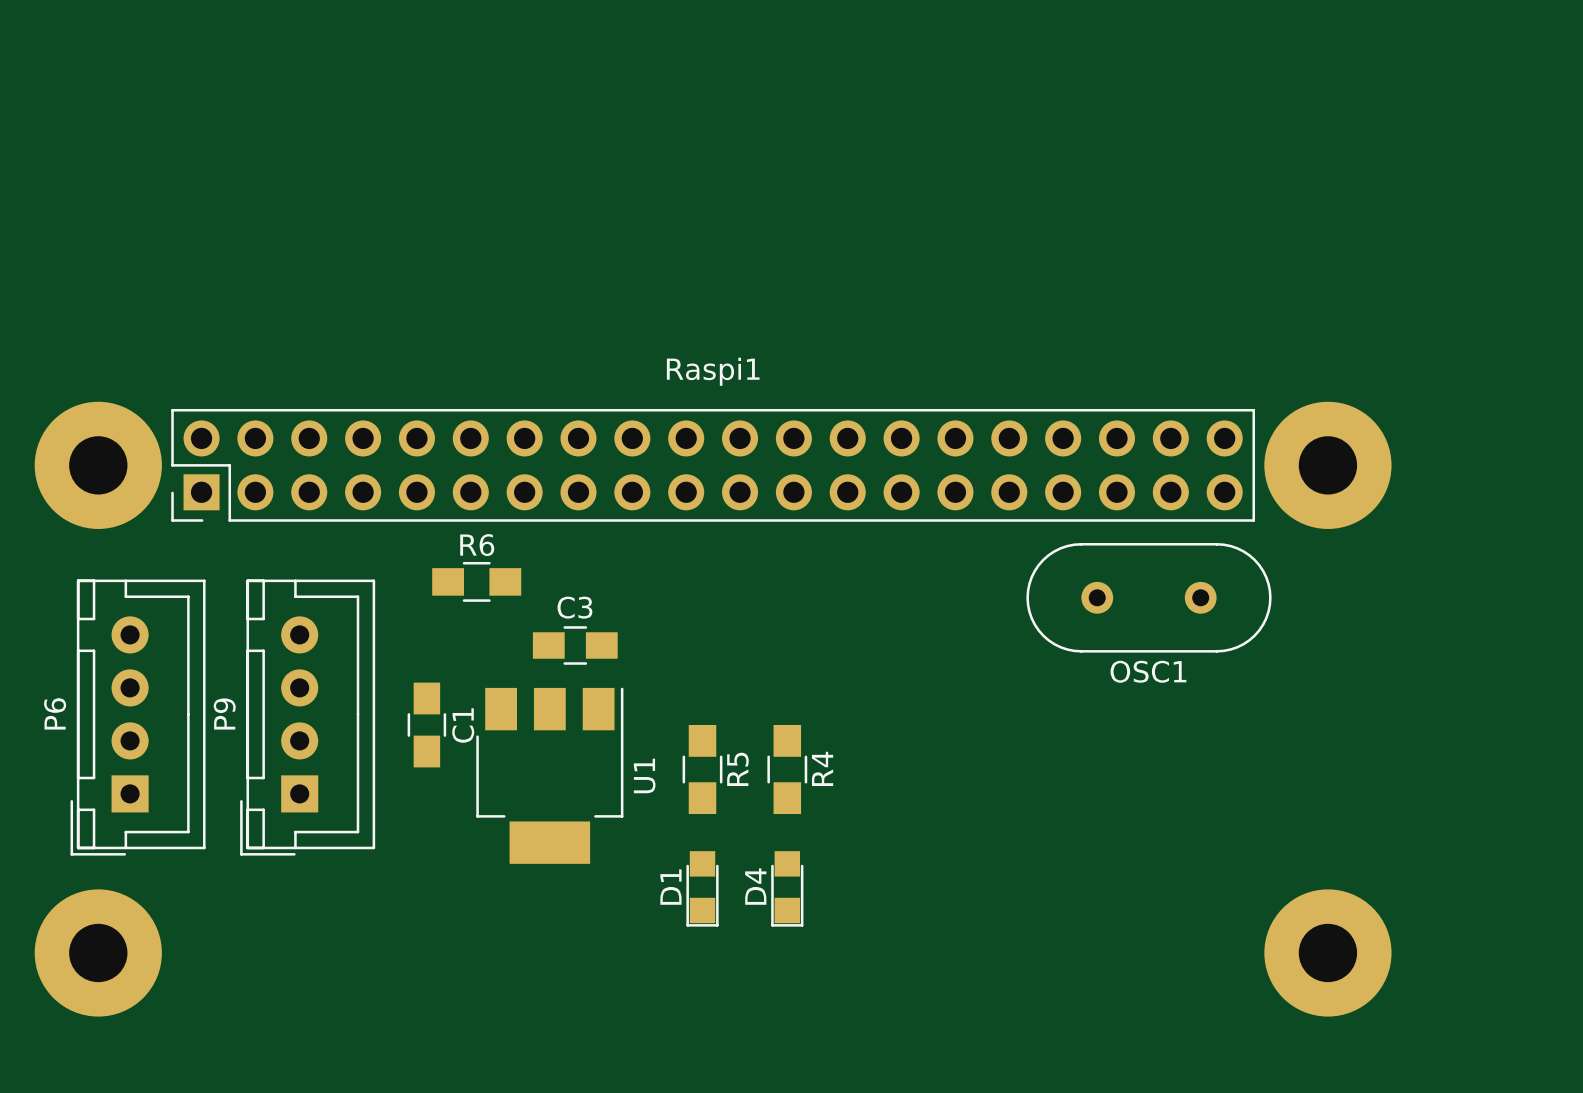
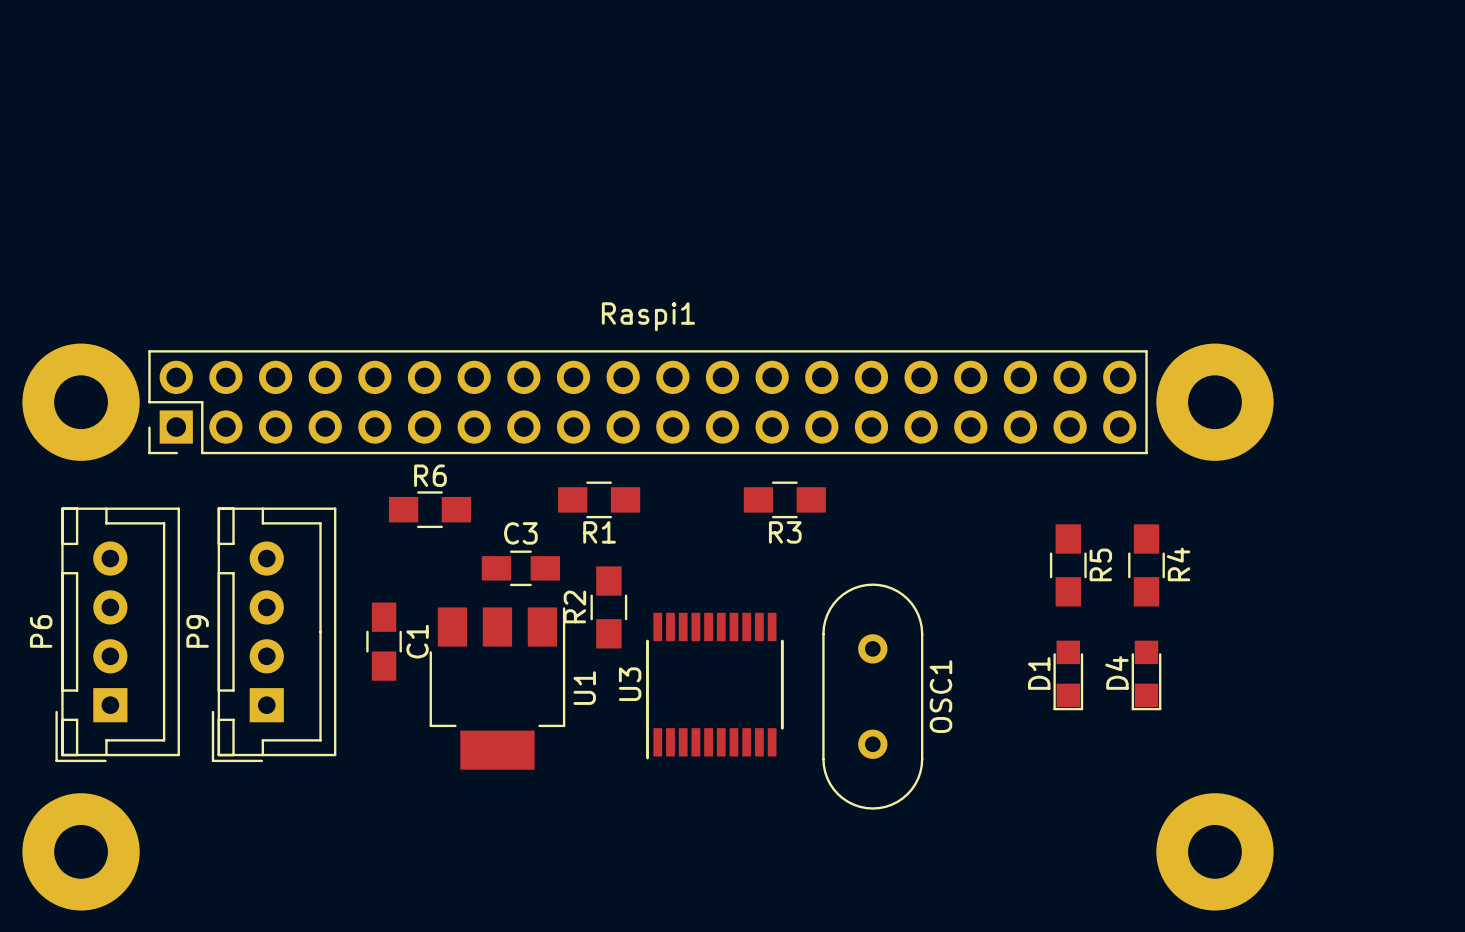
R1: none -> (599, 499)
R3: none -> (784, 499)
OSC1 rotation: 0° (1148, 597) -> 90° clockwise (872, 696)
OSC1 position: (1148, 597) -> (872, 696)
OSC1 name position: OSC1 (1148, 671) -> OSC1 (940, 696)
R2: none -> (608, 607)
R5 position: (702, 769) -> (1068, 565)
R4 position: (787, 769) -> (1146, 565)
U3: none -> (714, 686)
D1 position: (702, 888) -> (1068, 675)
D4 position: (787, 888) -> (1146, 675)

